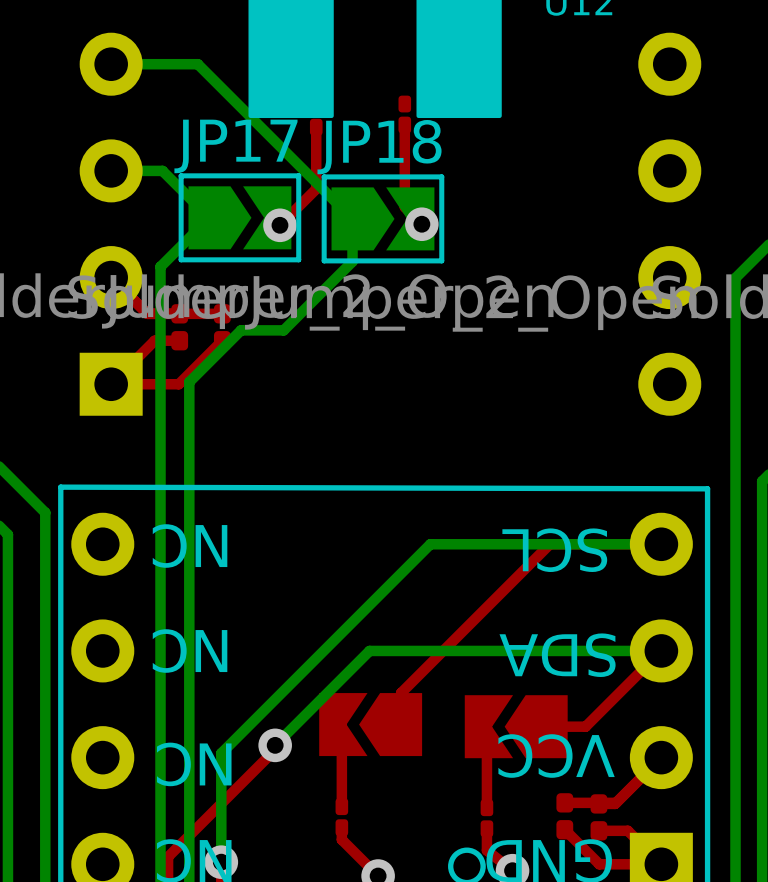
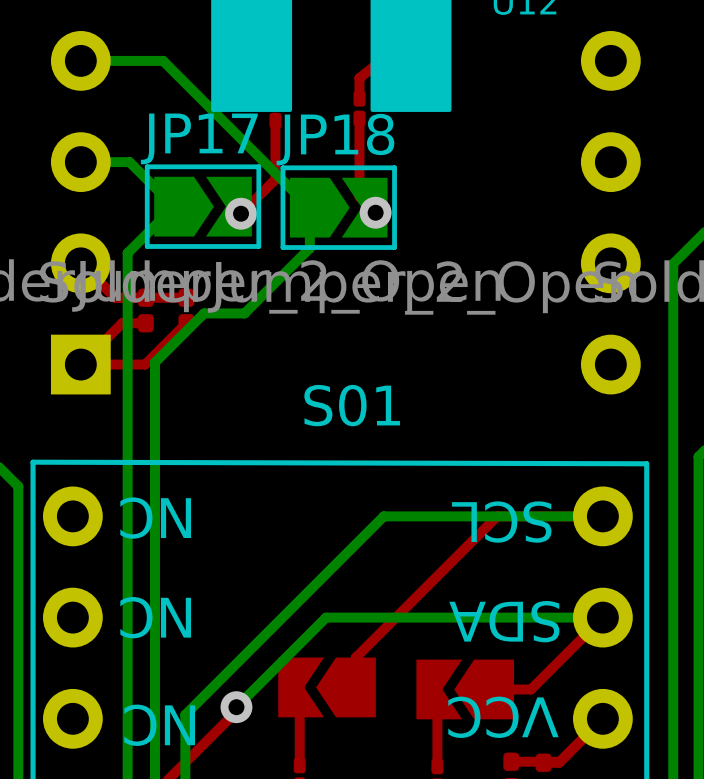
top track: none -> (388, 54) (359, 78) (359, 98)
text: none -> S01 (352, 405)

